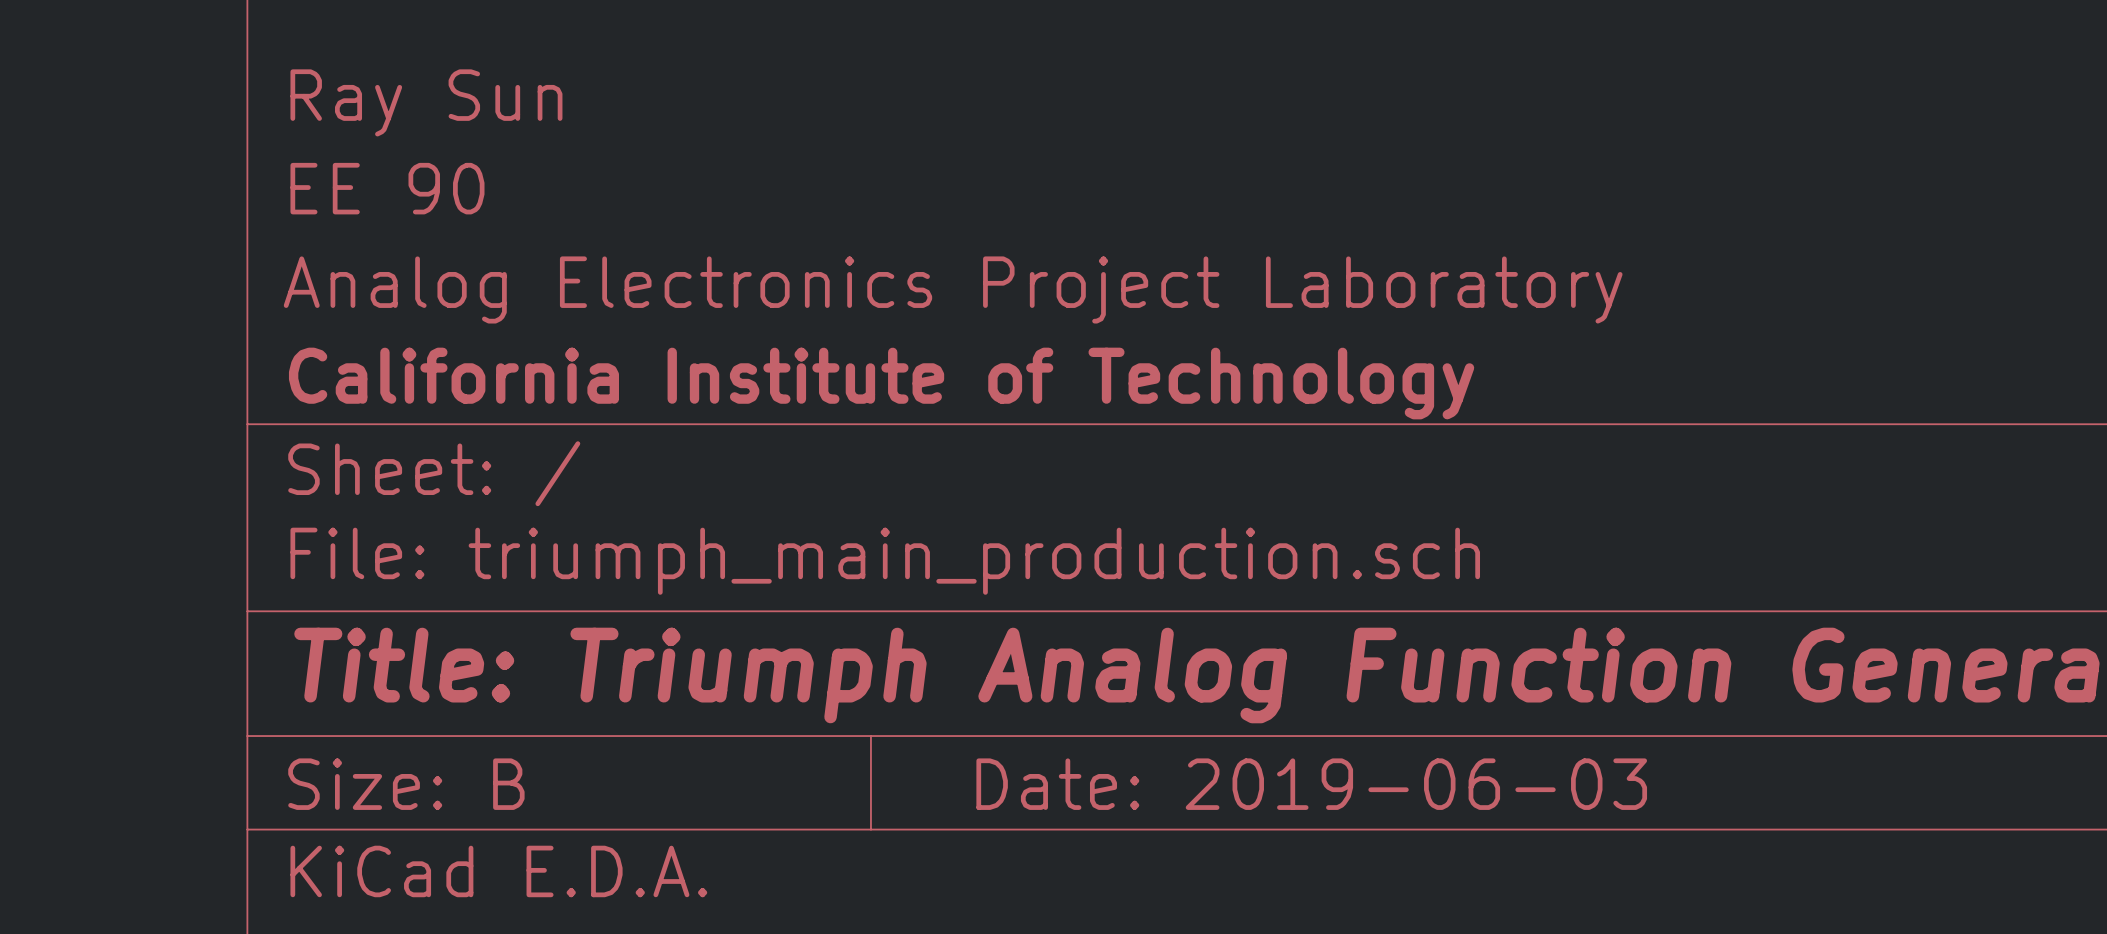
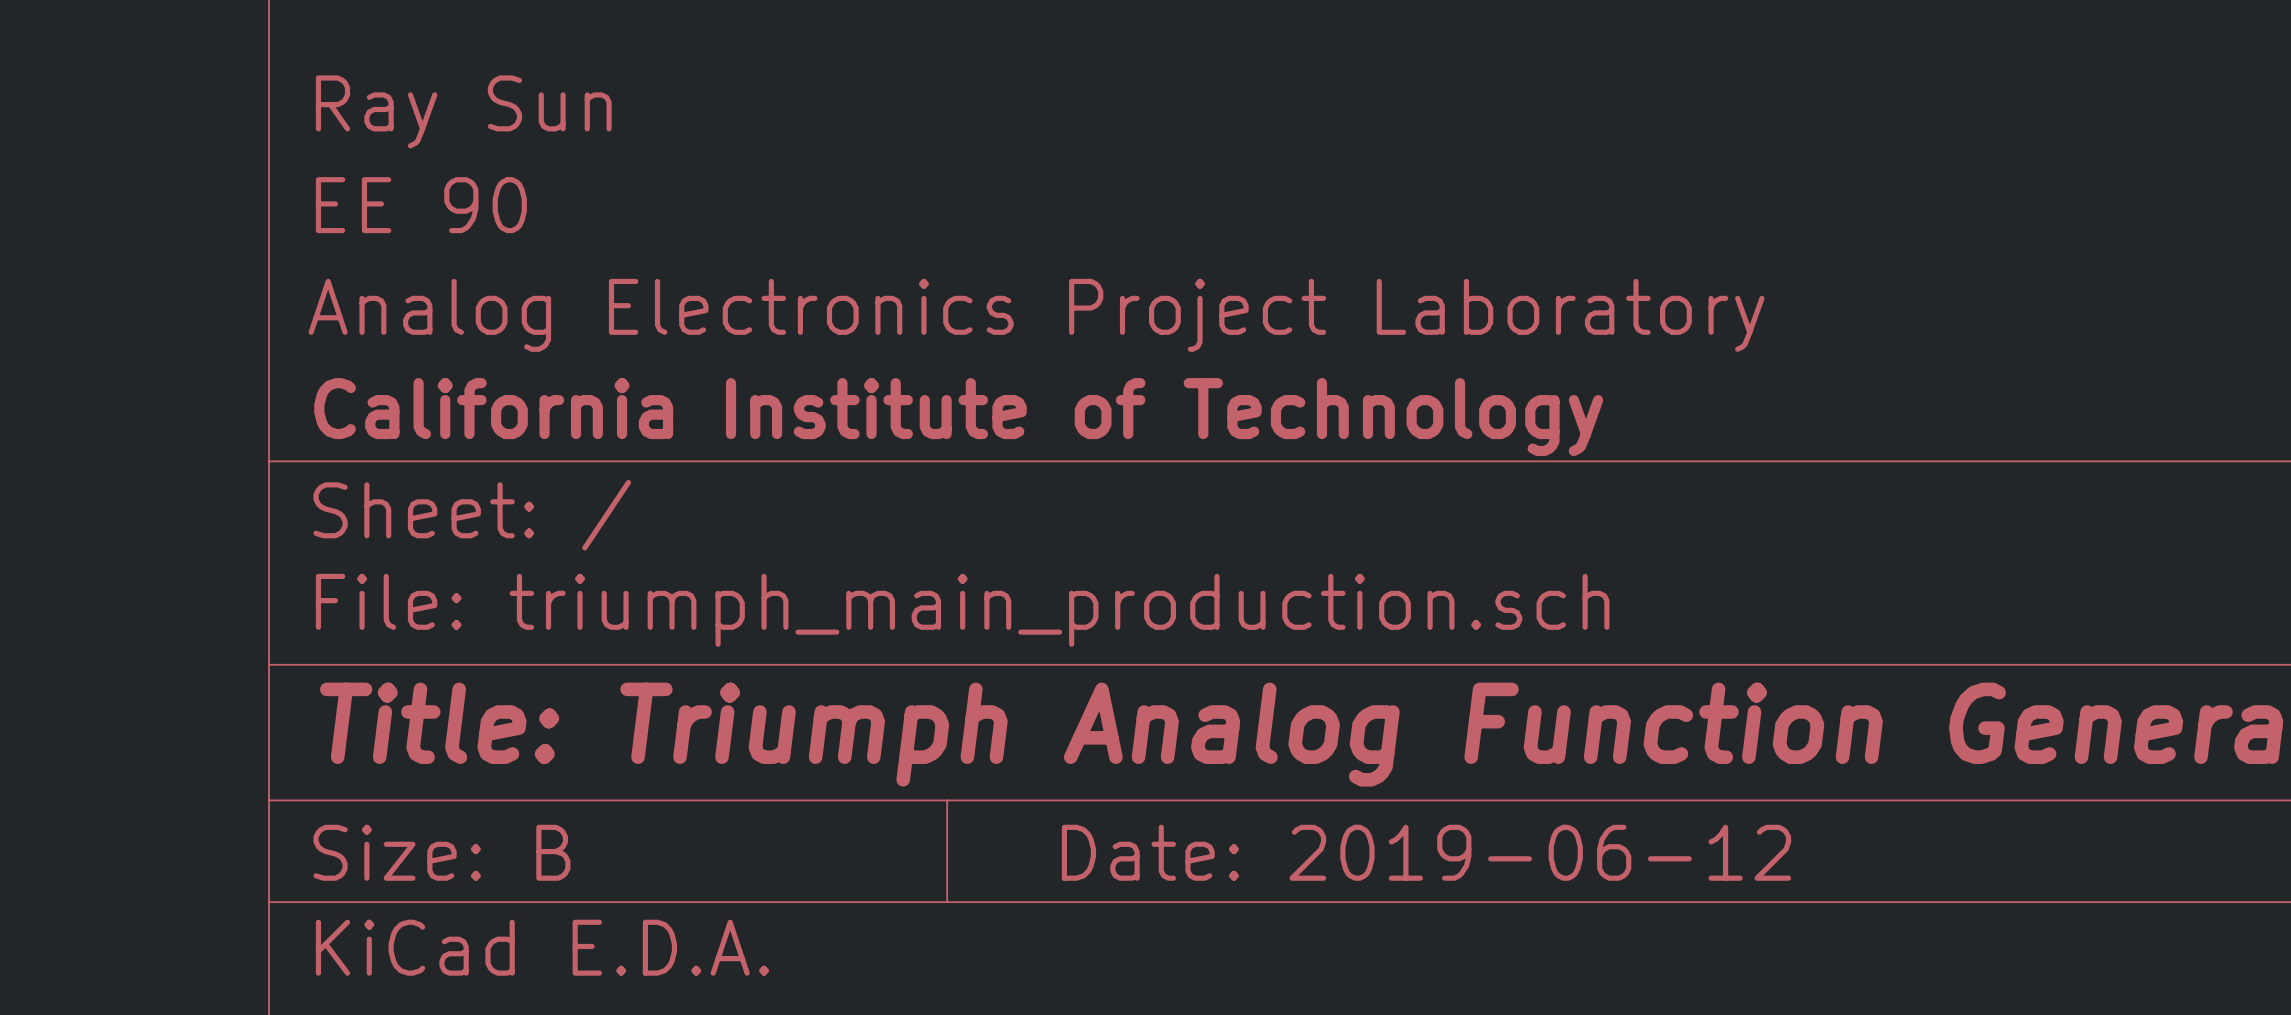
title block: Date: 2019-06-03 (1311, 784) -> Date: 2019-06-12 (1426, 852)

